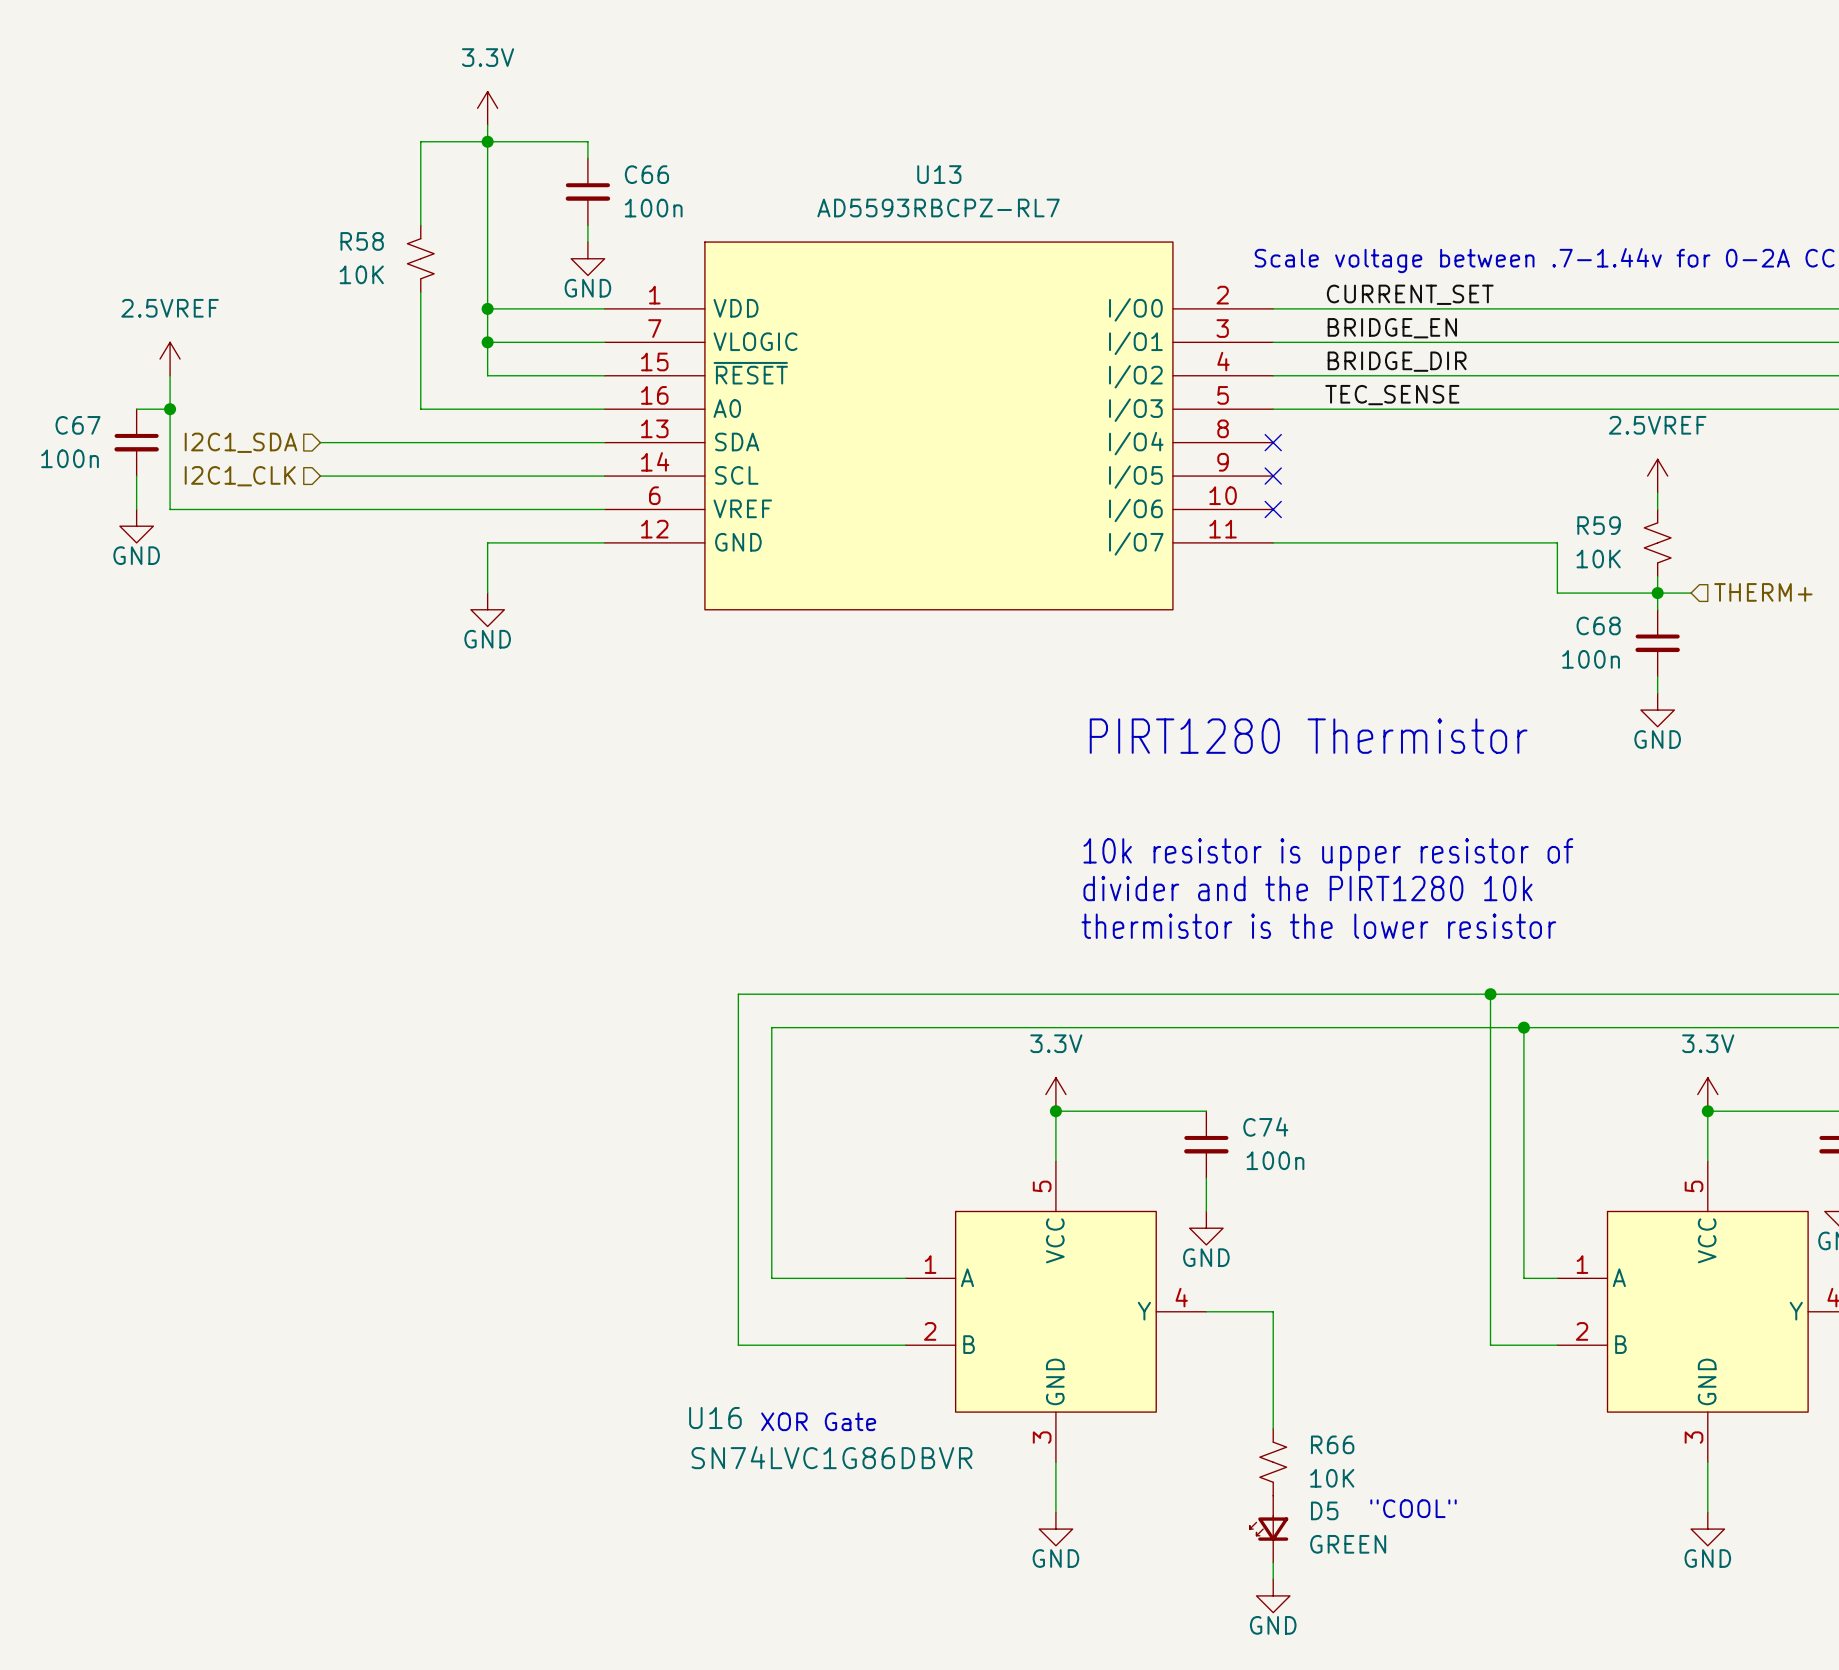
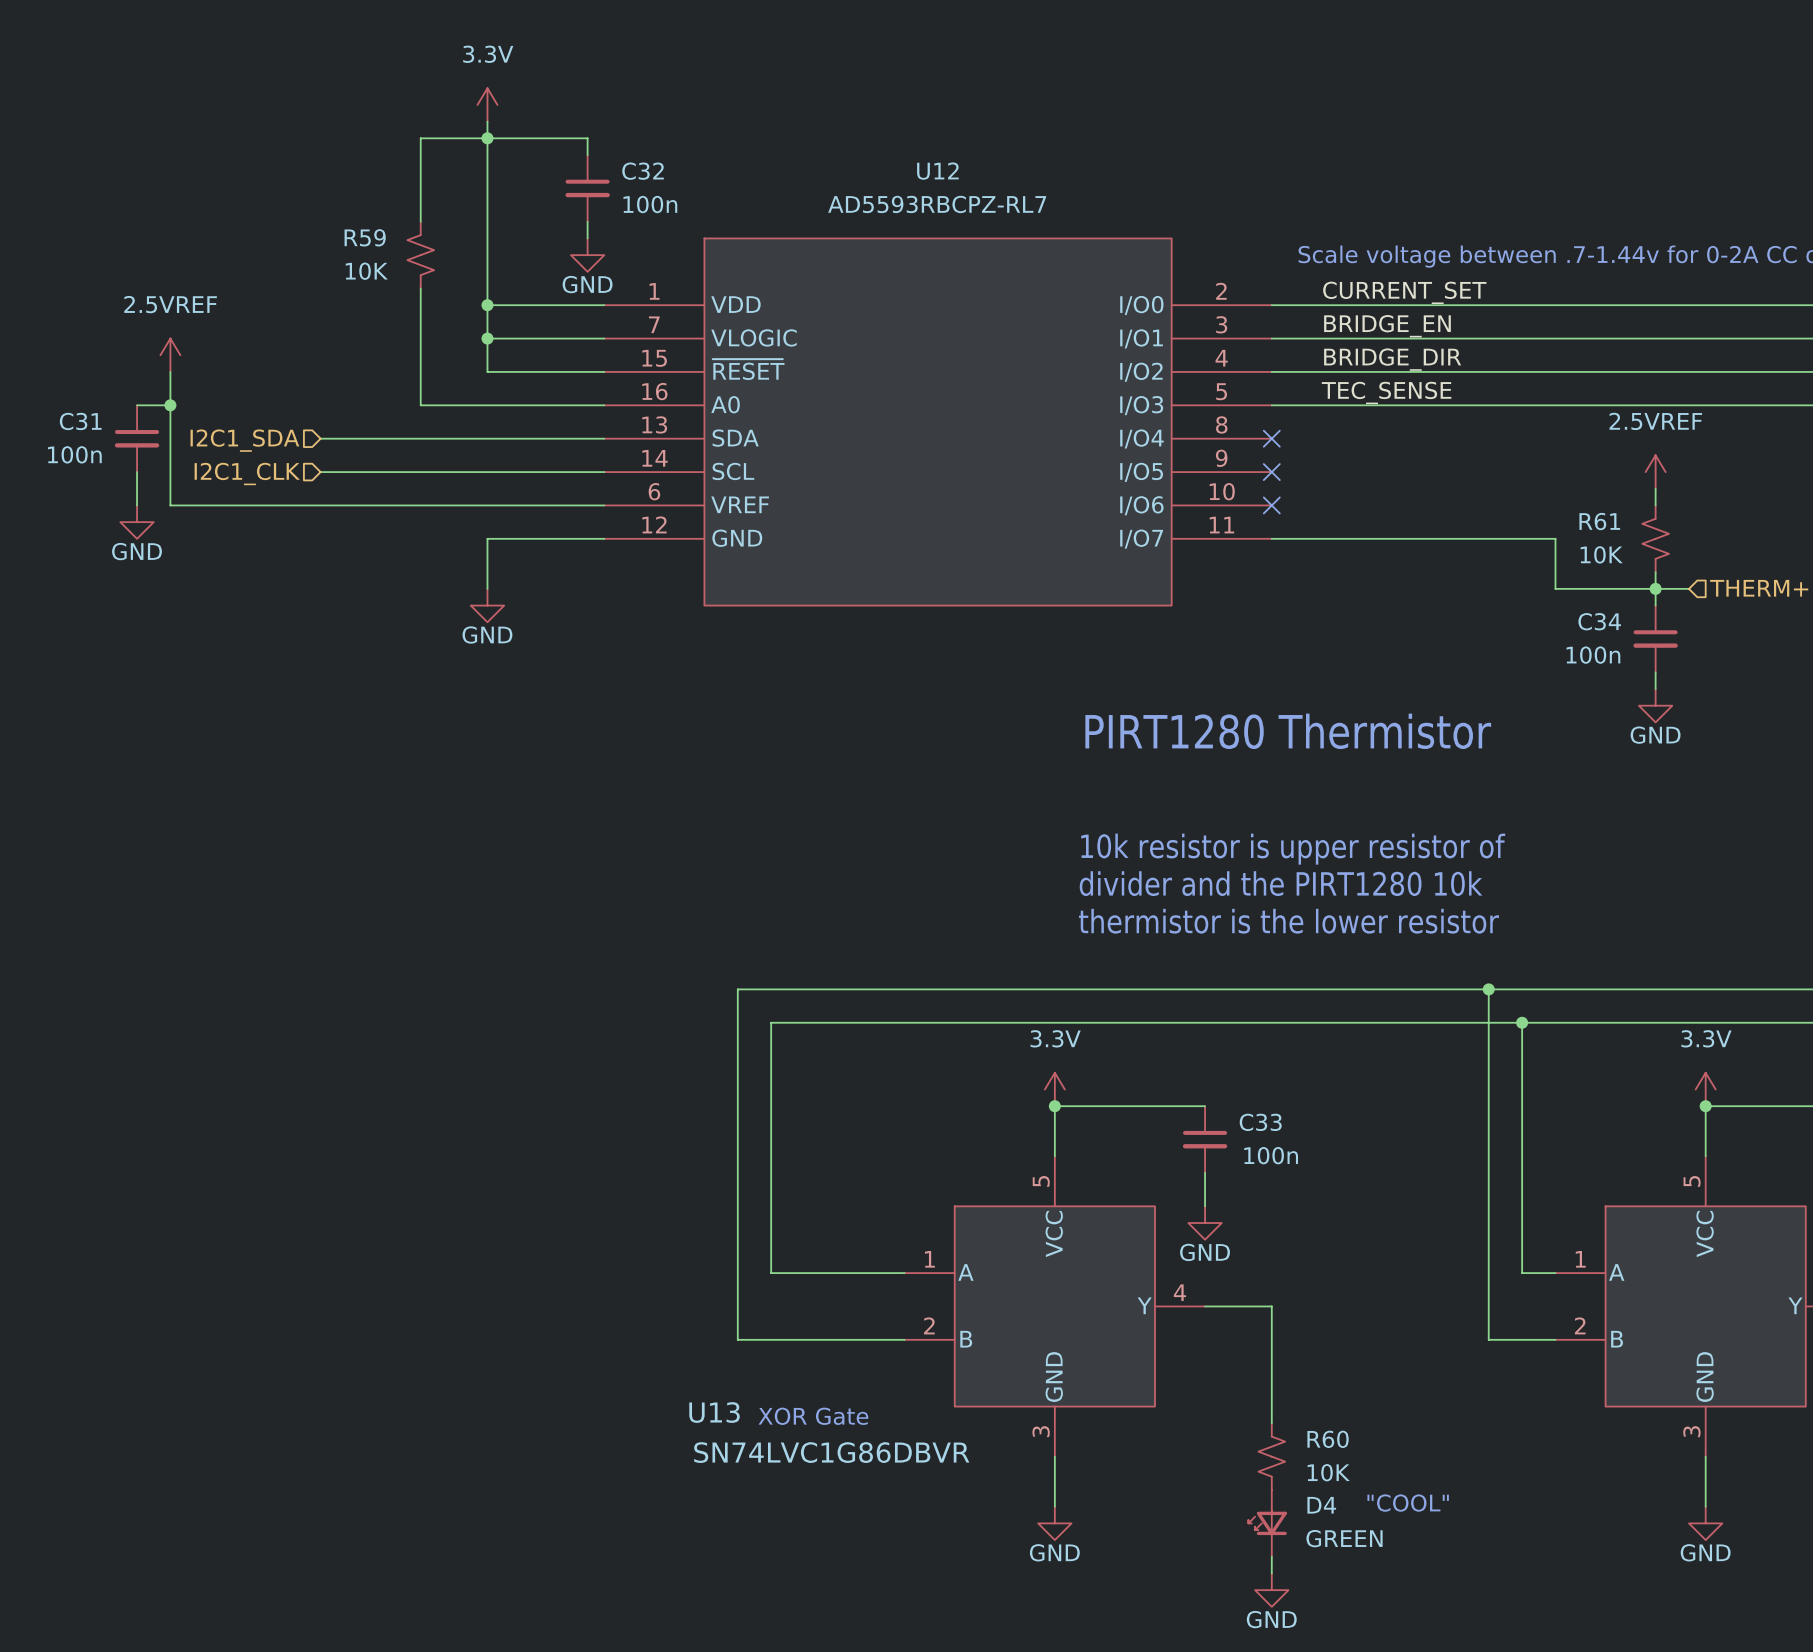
C66 name: C66 (646, 174) -> C32 (643, 171)
U13 name: U13 (939, 174) -> U12 (937, 171)
R58 name: R58 (362, 241) -> R59 (365, 237)
C67 name: C67 (78, 425) -> C31 (80, 421)
R59 name: R59 (1599, 525) -> R61 (1599, 521)
C68 name: C68 (1598, 625) -> C34 (1599, 621)
C74 name: C74 (1265, 1126) -> C33 (1260, 1122)
U16 name: U16 (715, 1418) -> U13 (714, 1412)
R66 name: R66 (1332, 1444) -> R60 (1328, 1439)
D5 name: D5 (1324, 1510) -> D4 (1321, 1505)

